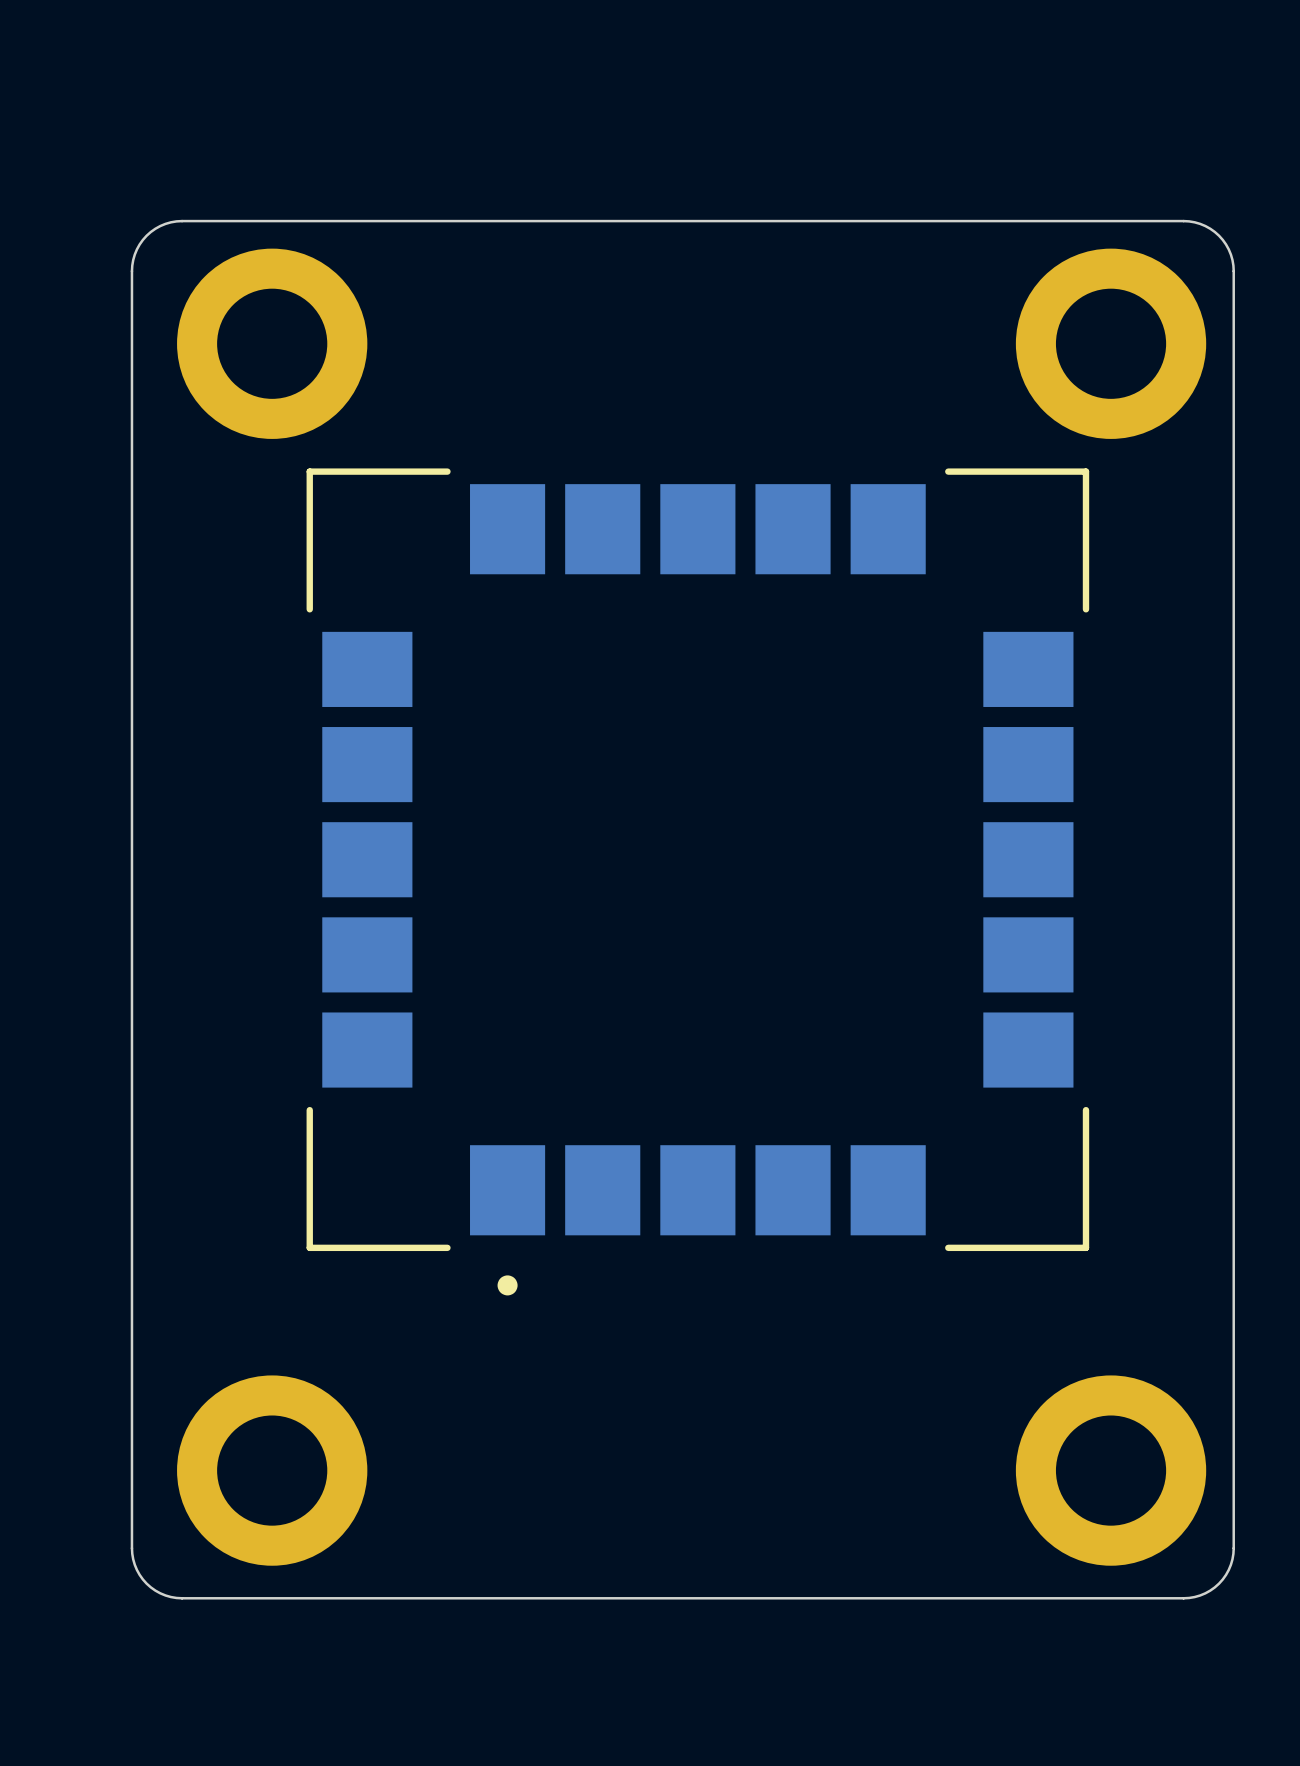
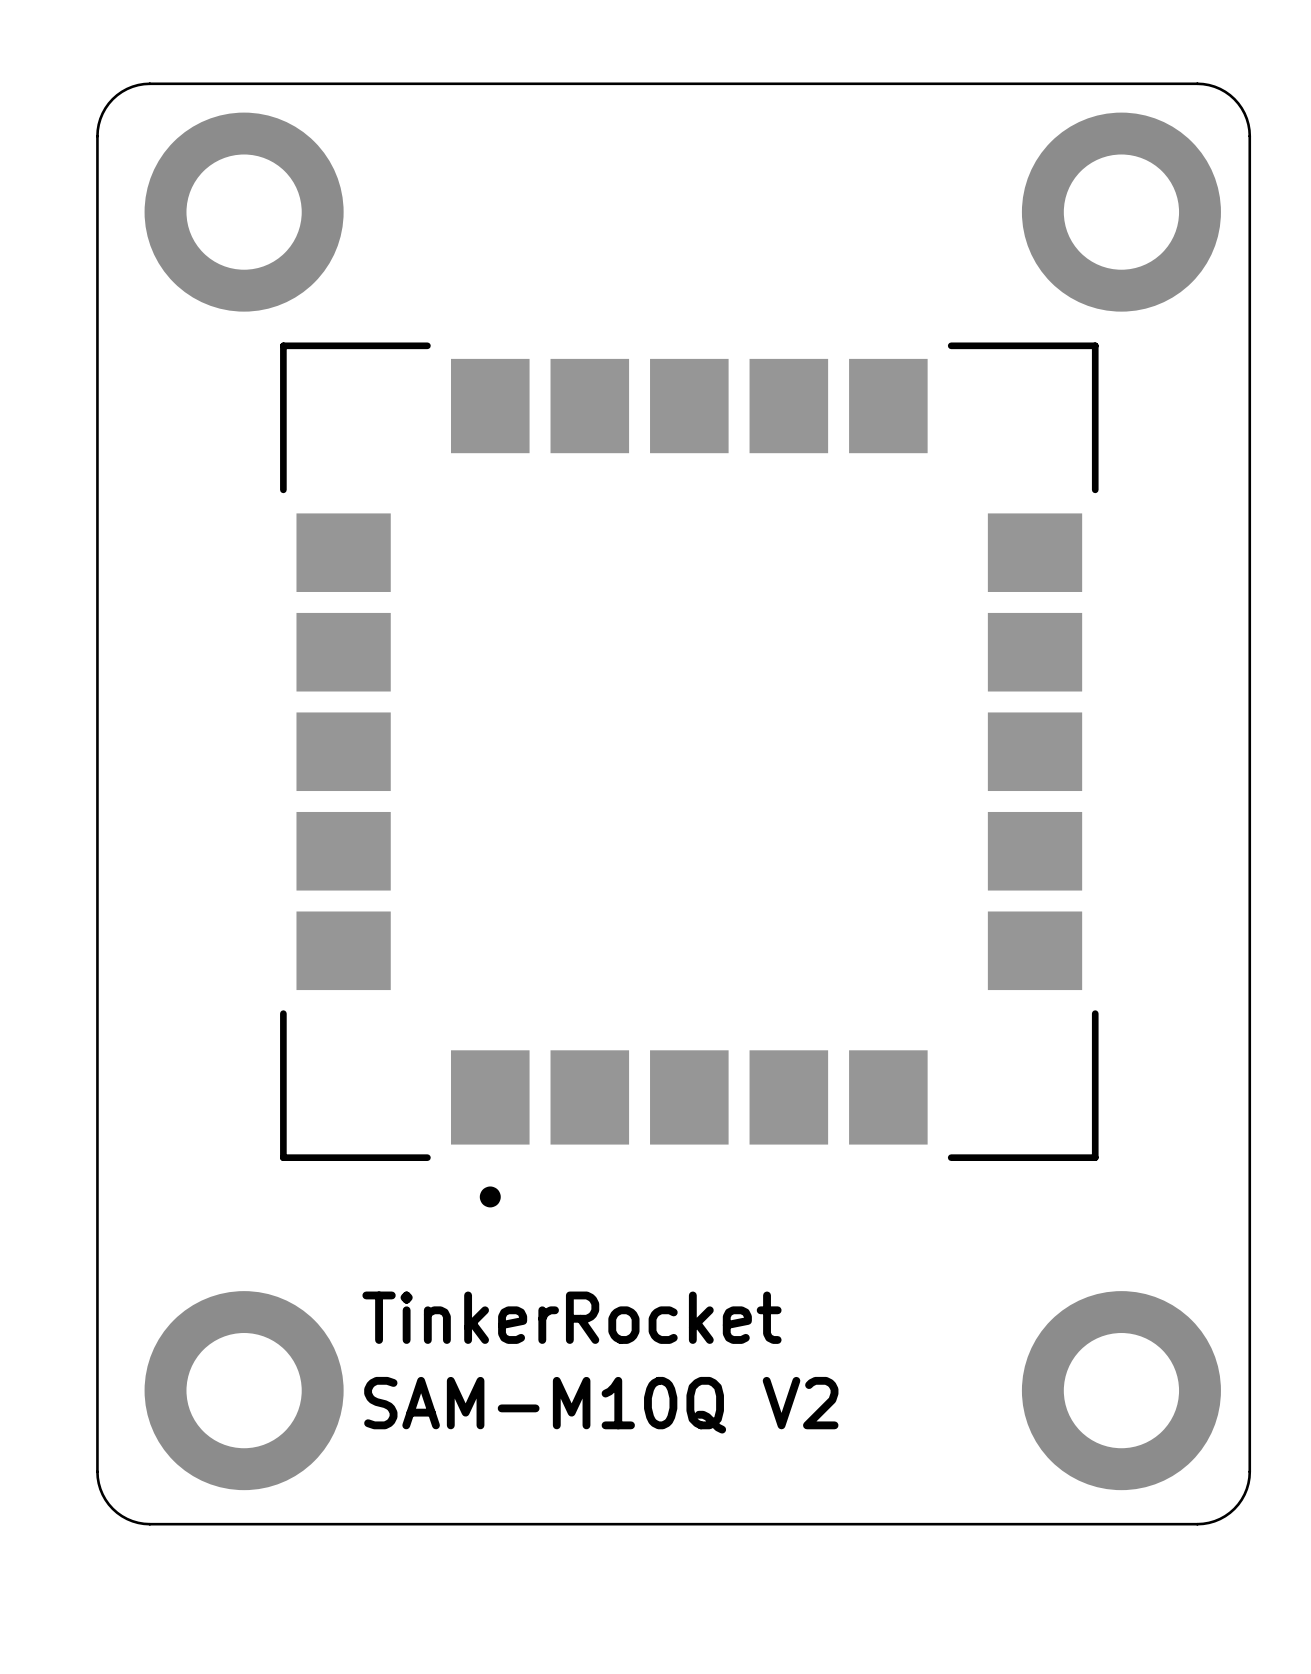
text: none -> TinkerRocket (571, 1317)
text: none -> SAM-M10Q V2 (601, 1405)

